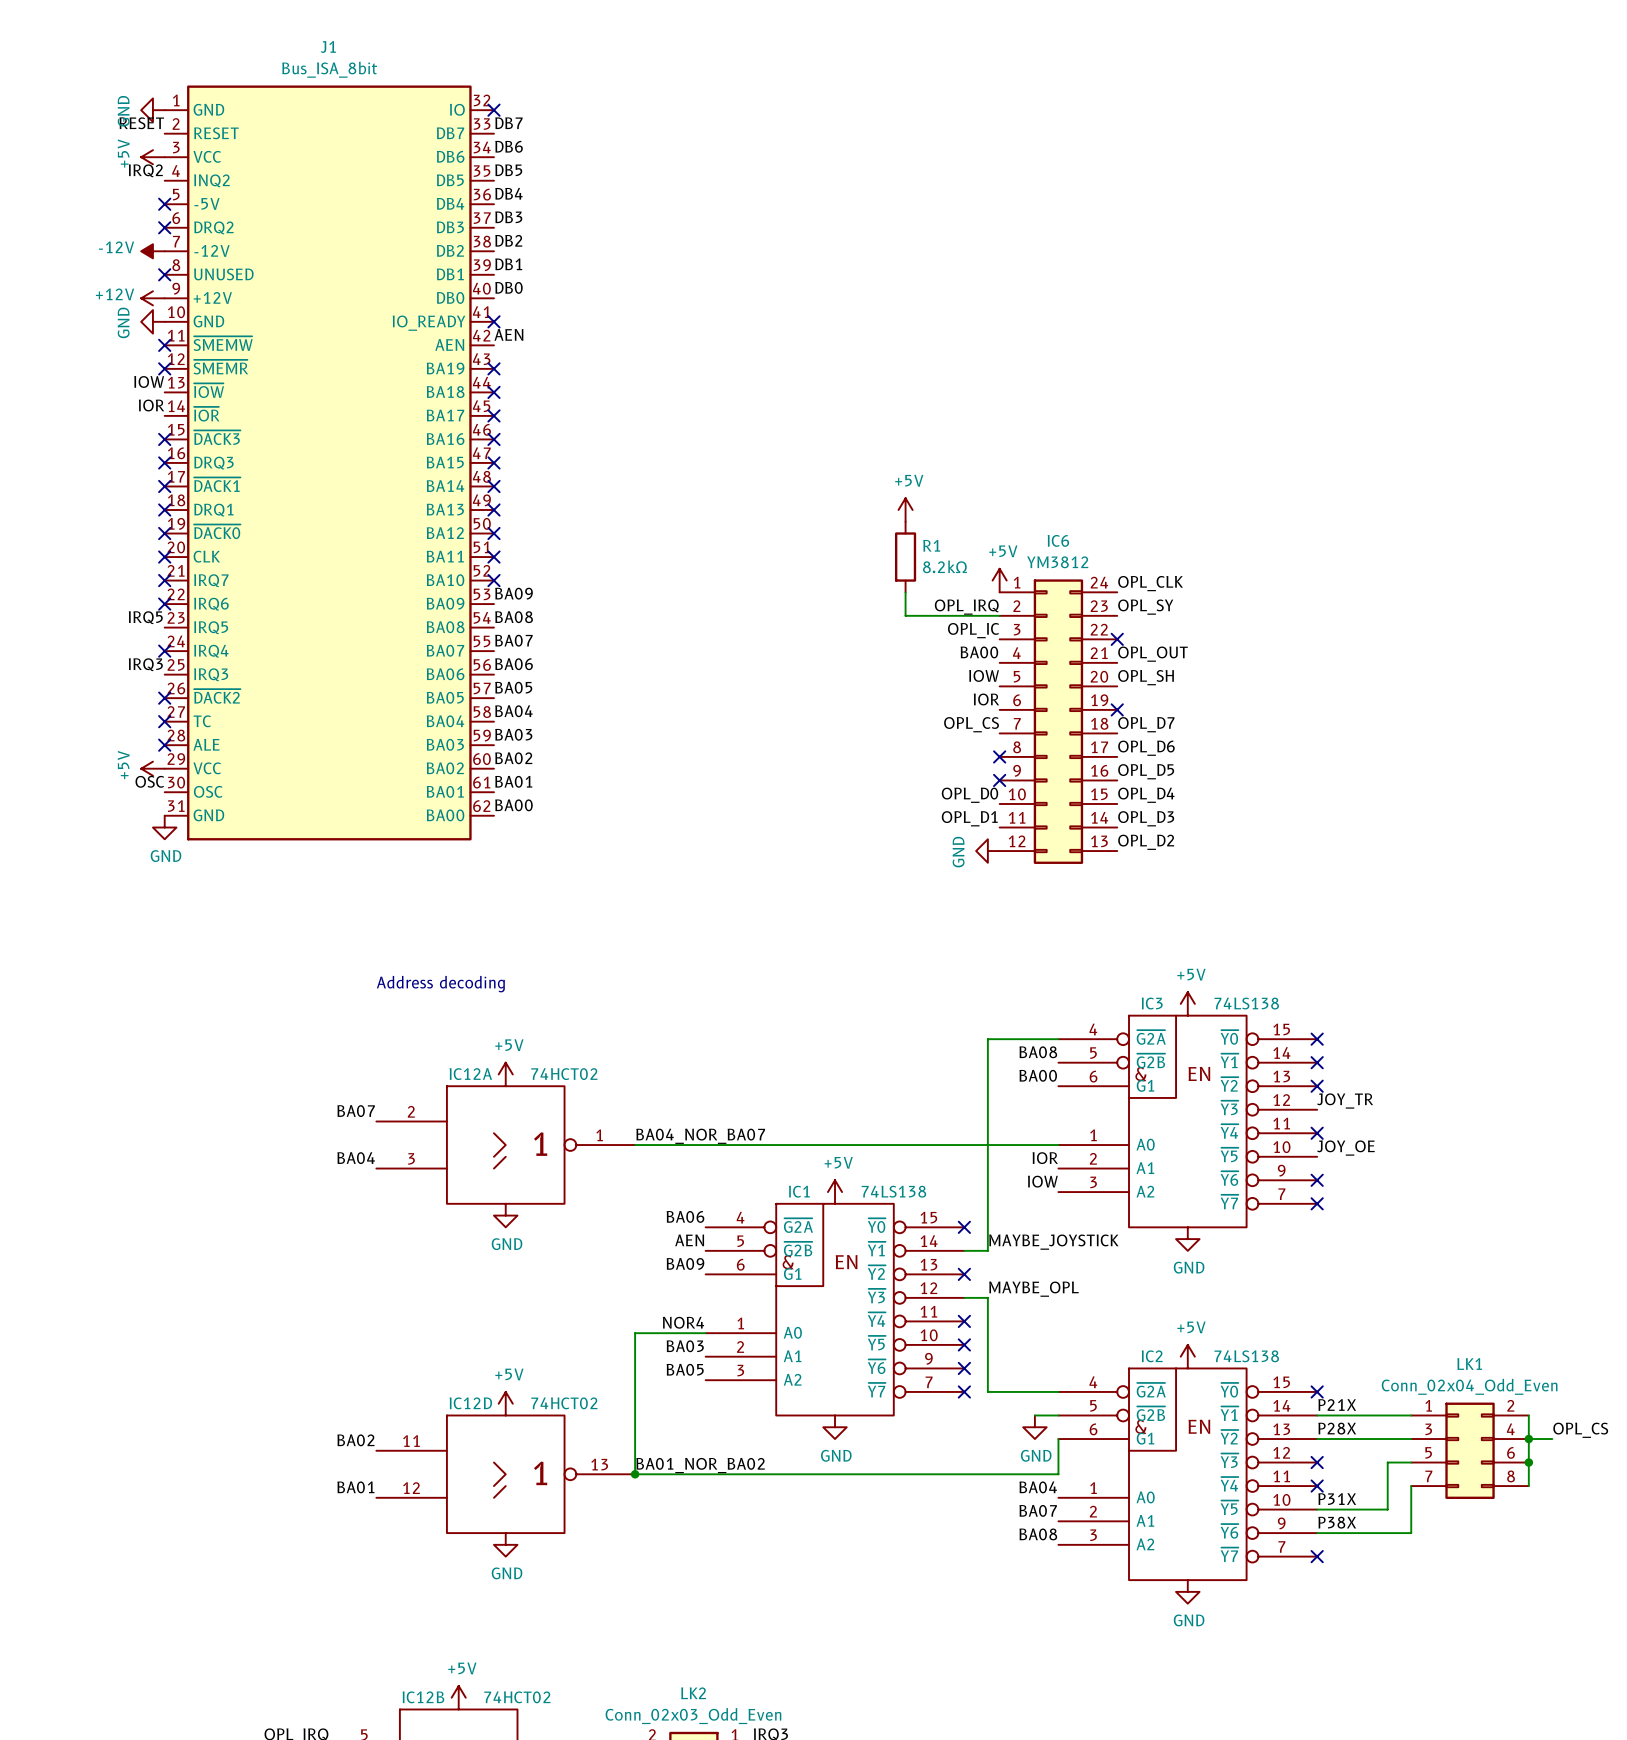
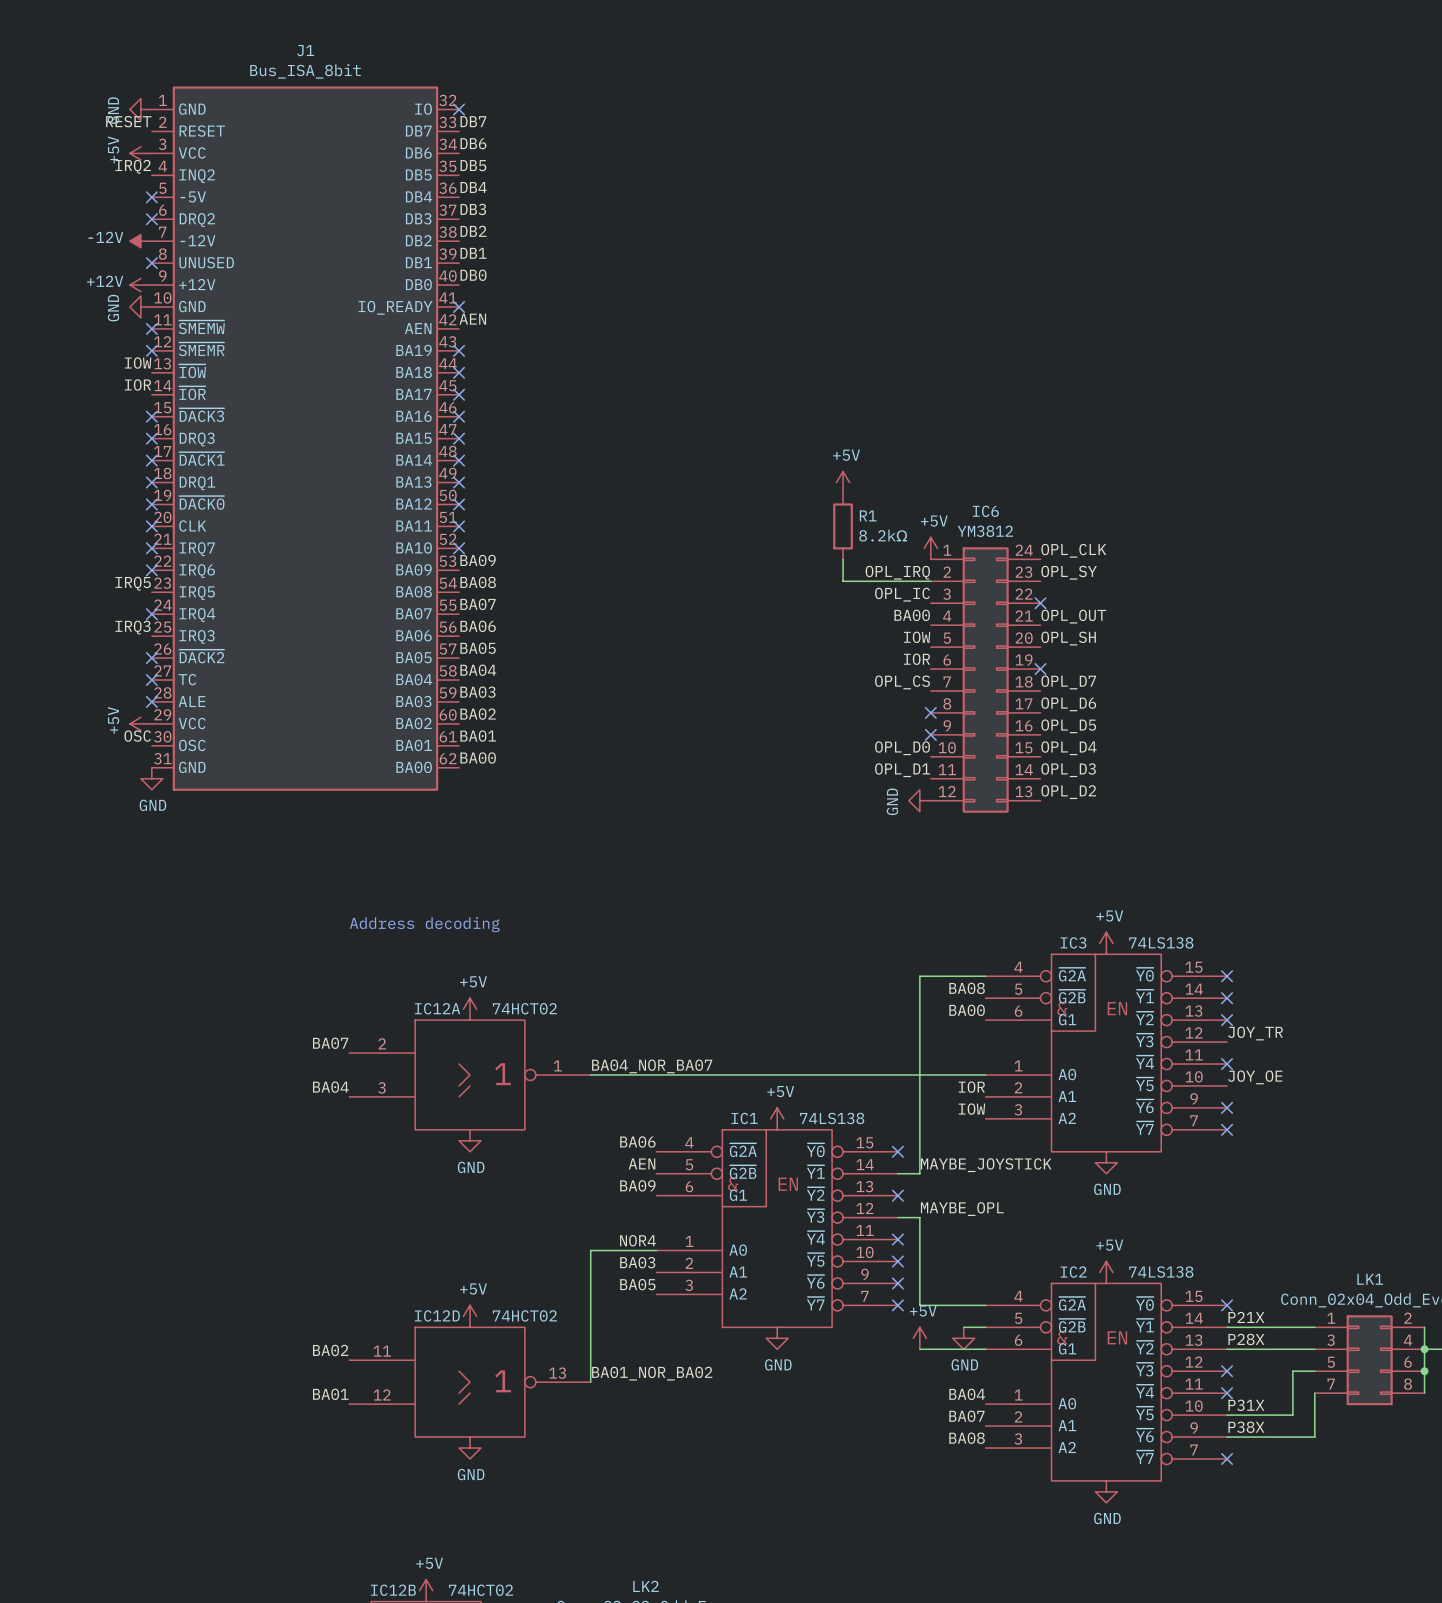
power symbol: none -> +5V (919, 1338)
wire: (1058, 1439) (1058, 1474) (635, 1474) -> (985, 1349) (919, 1349)
junction: (635, 1474) -> none

